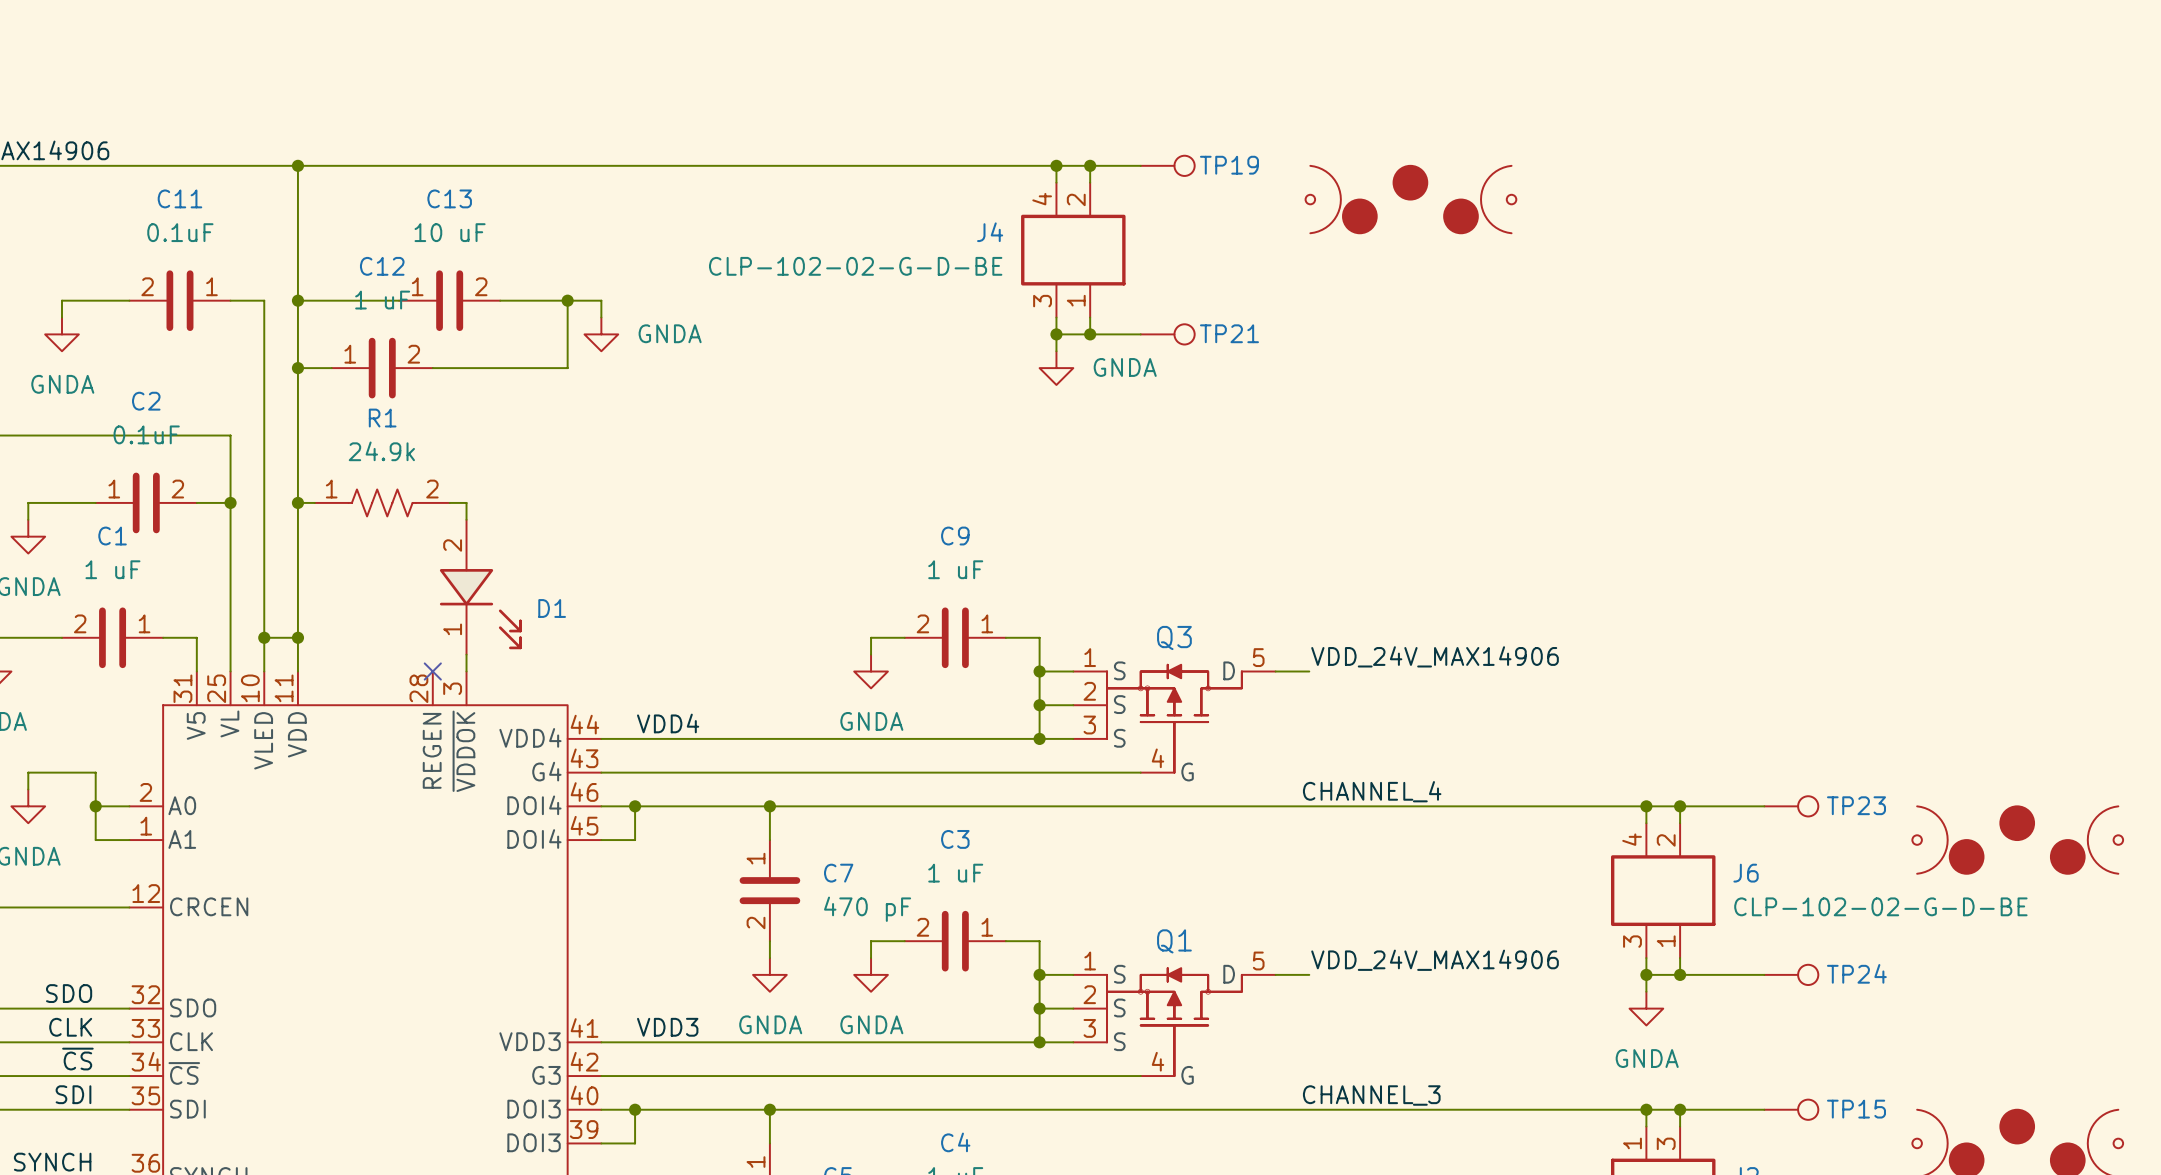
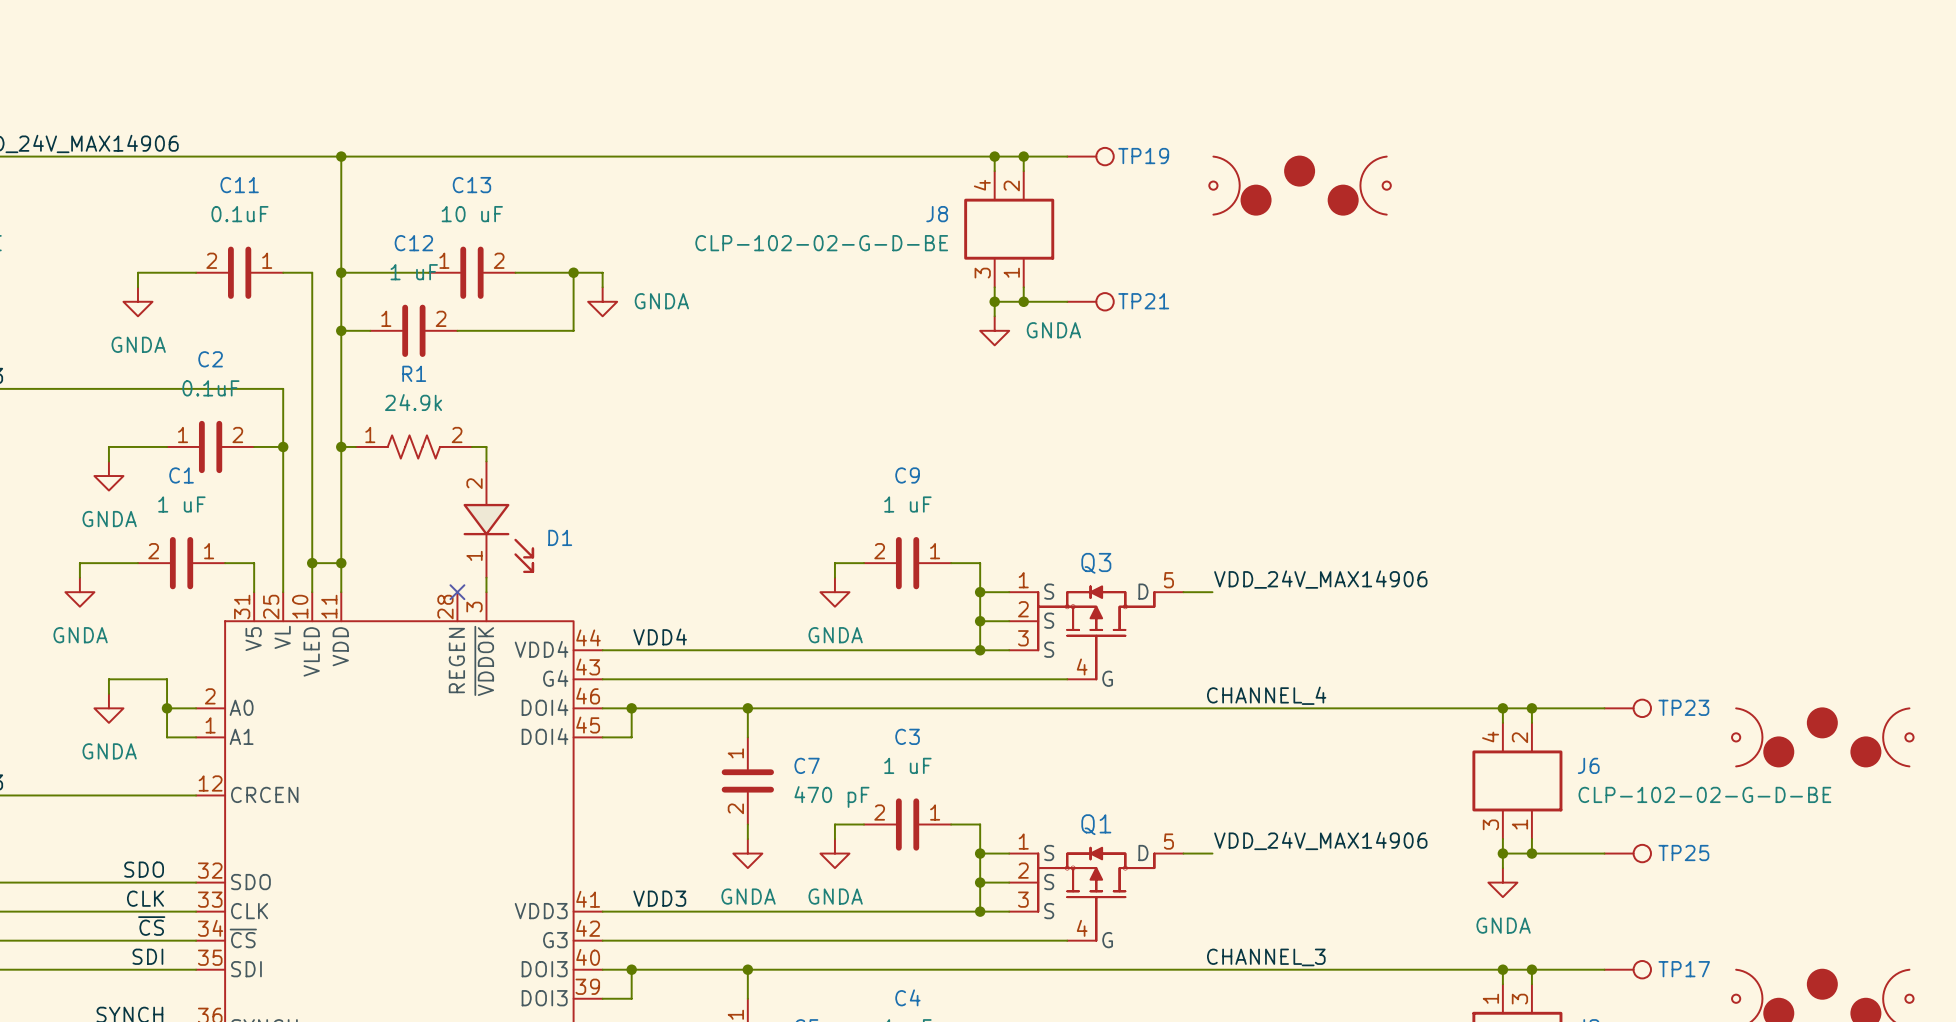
J4 name: J4 (990, 232) -> J8 (937, 214)
TP24 name: TP24 (1856, 973) -> TP25 (1683, 853)
TP15 name: TP15 (1856, 1109) -> TP17 (1684, 969)

